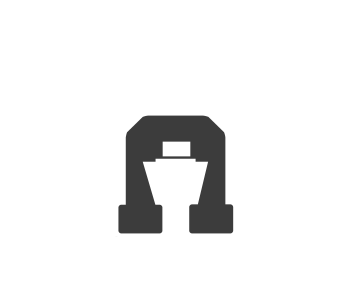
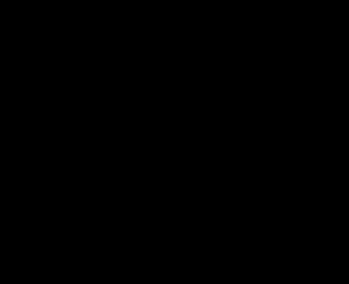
drawing: [118, 115, 234, 234] -> none

